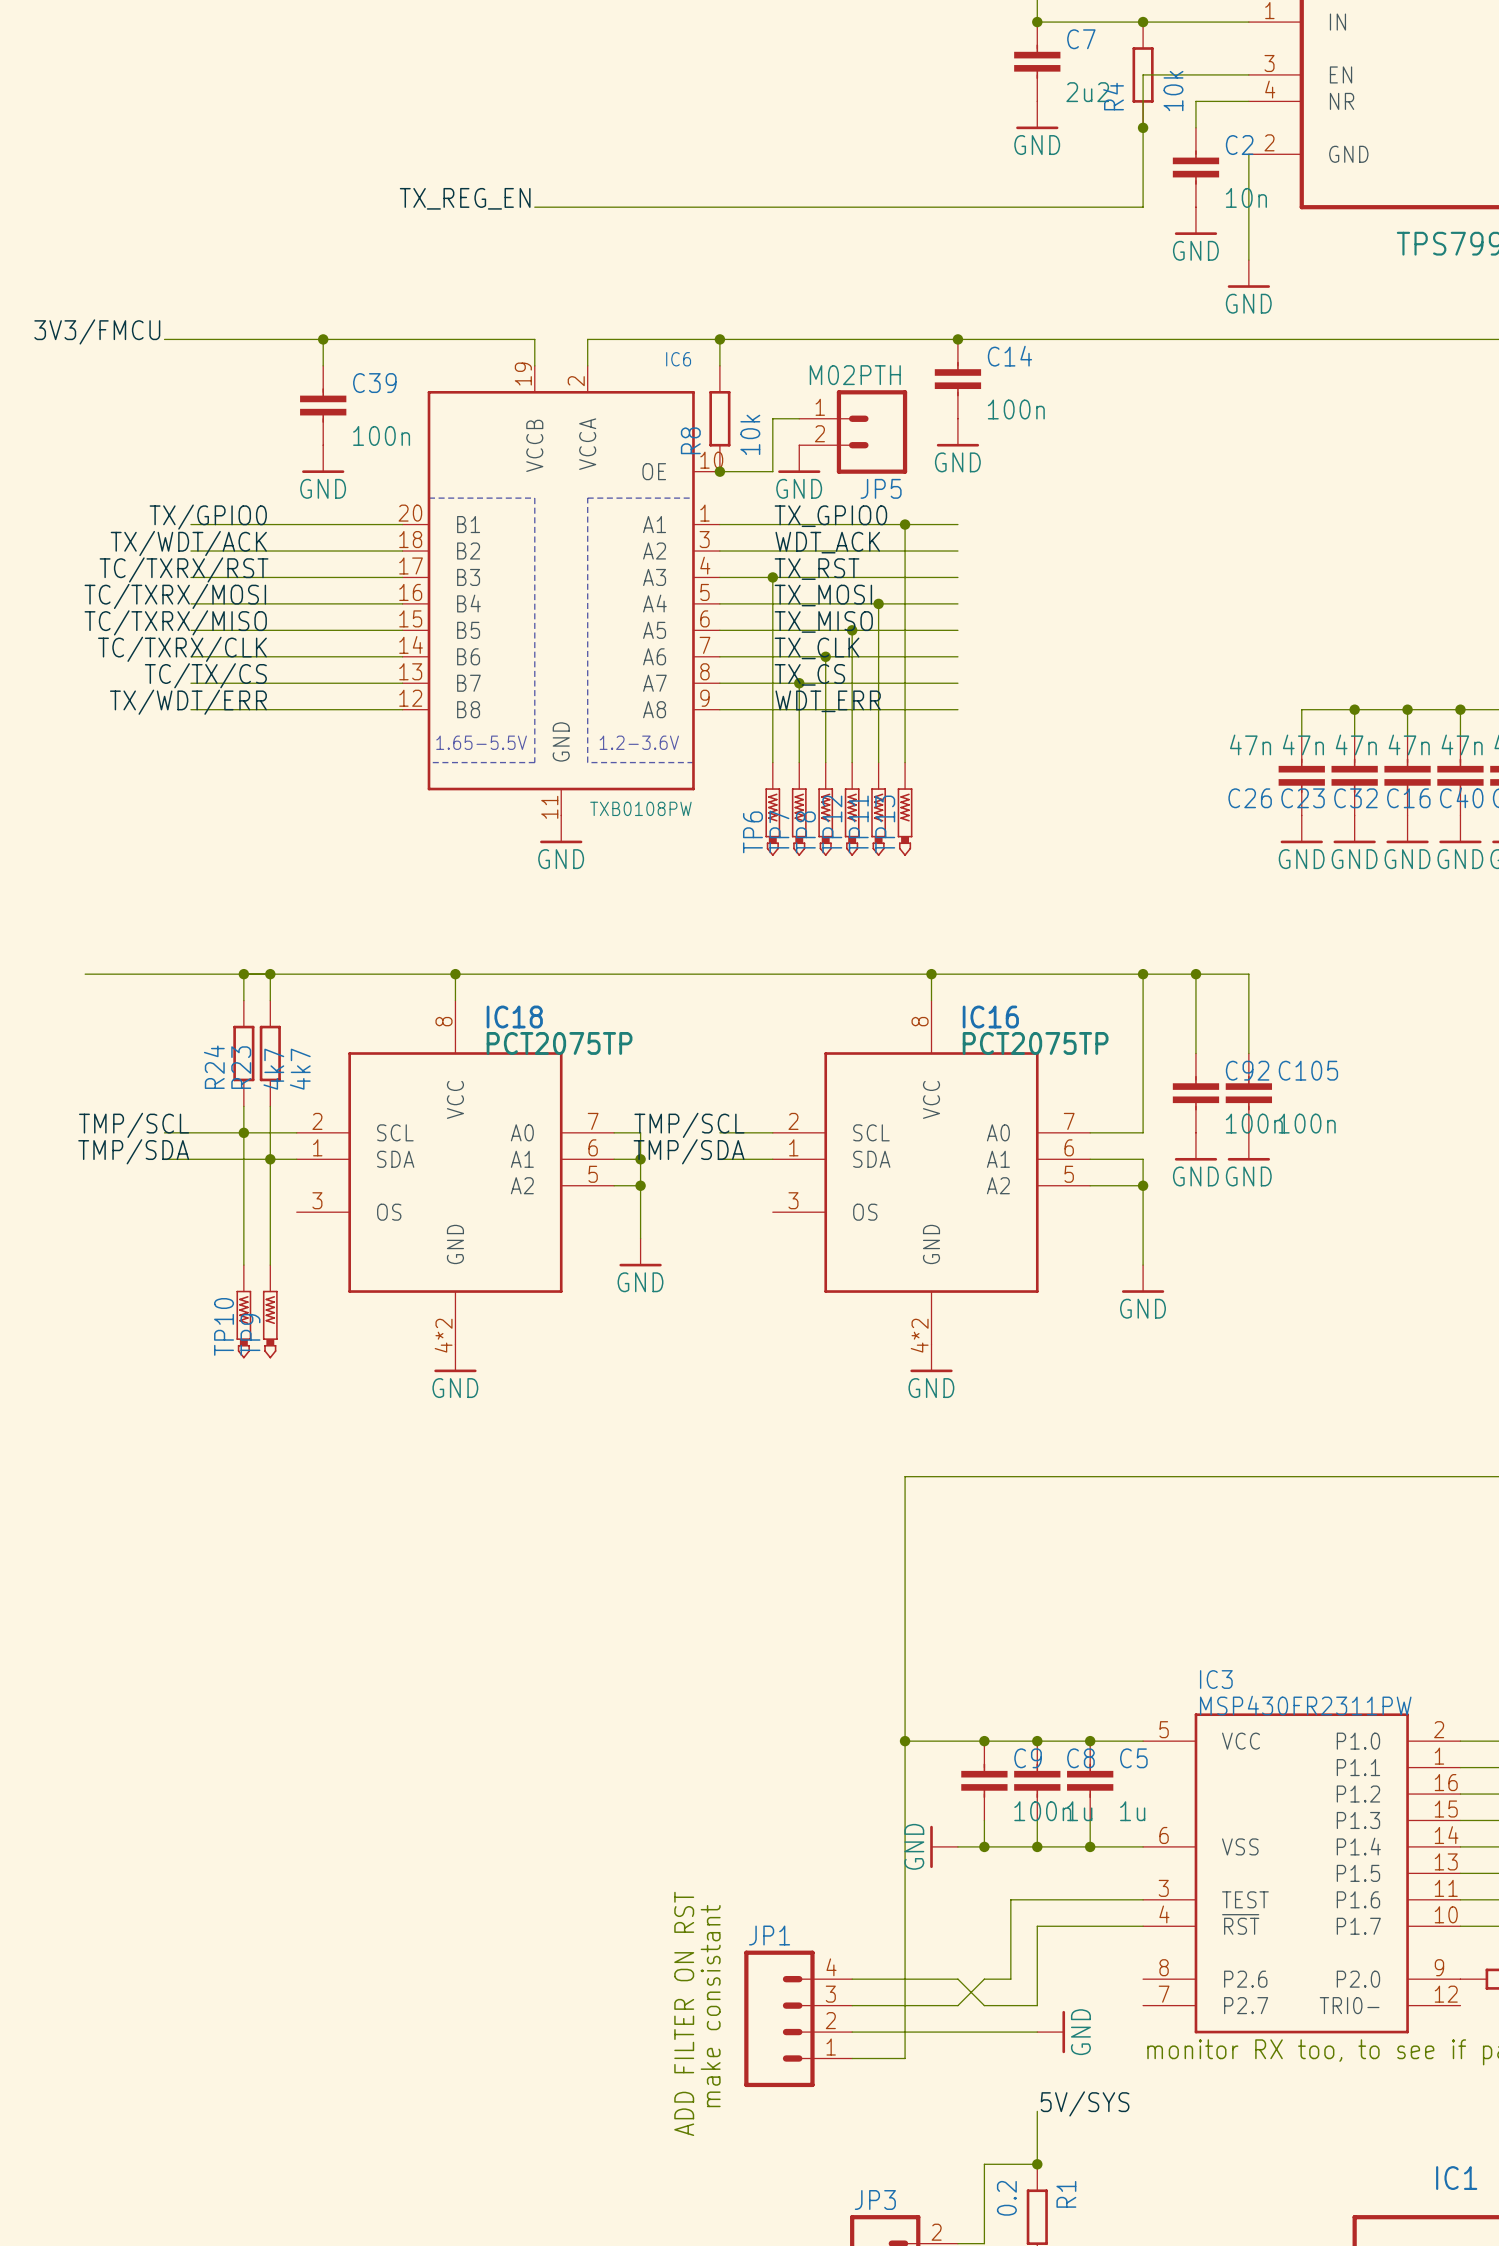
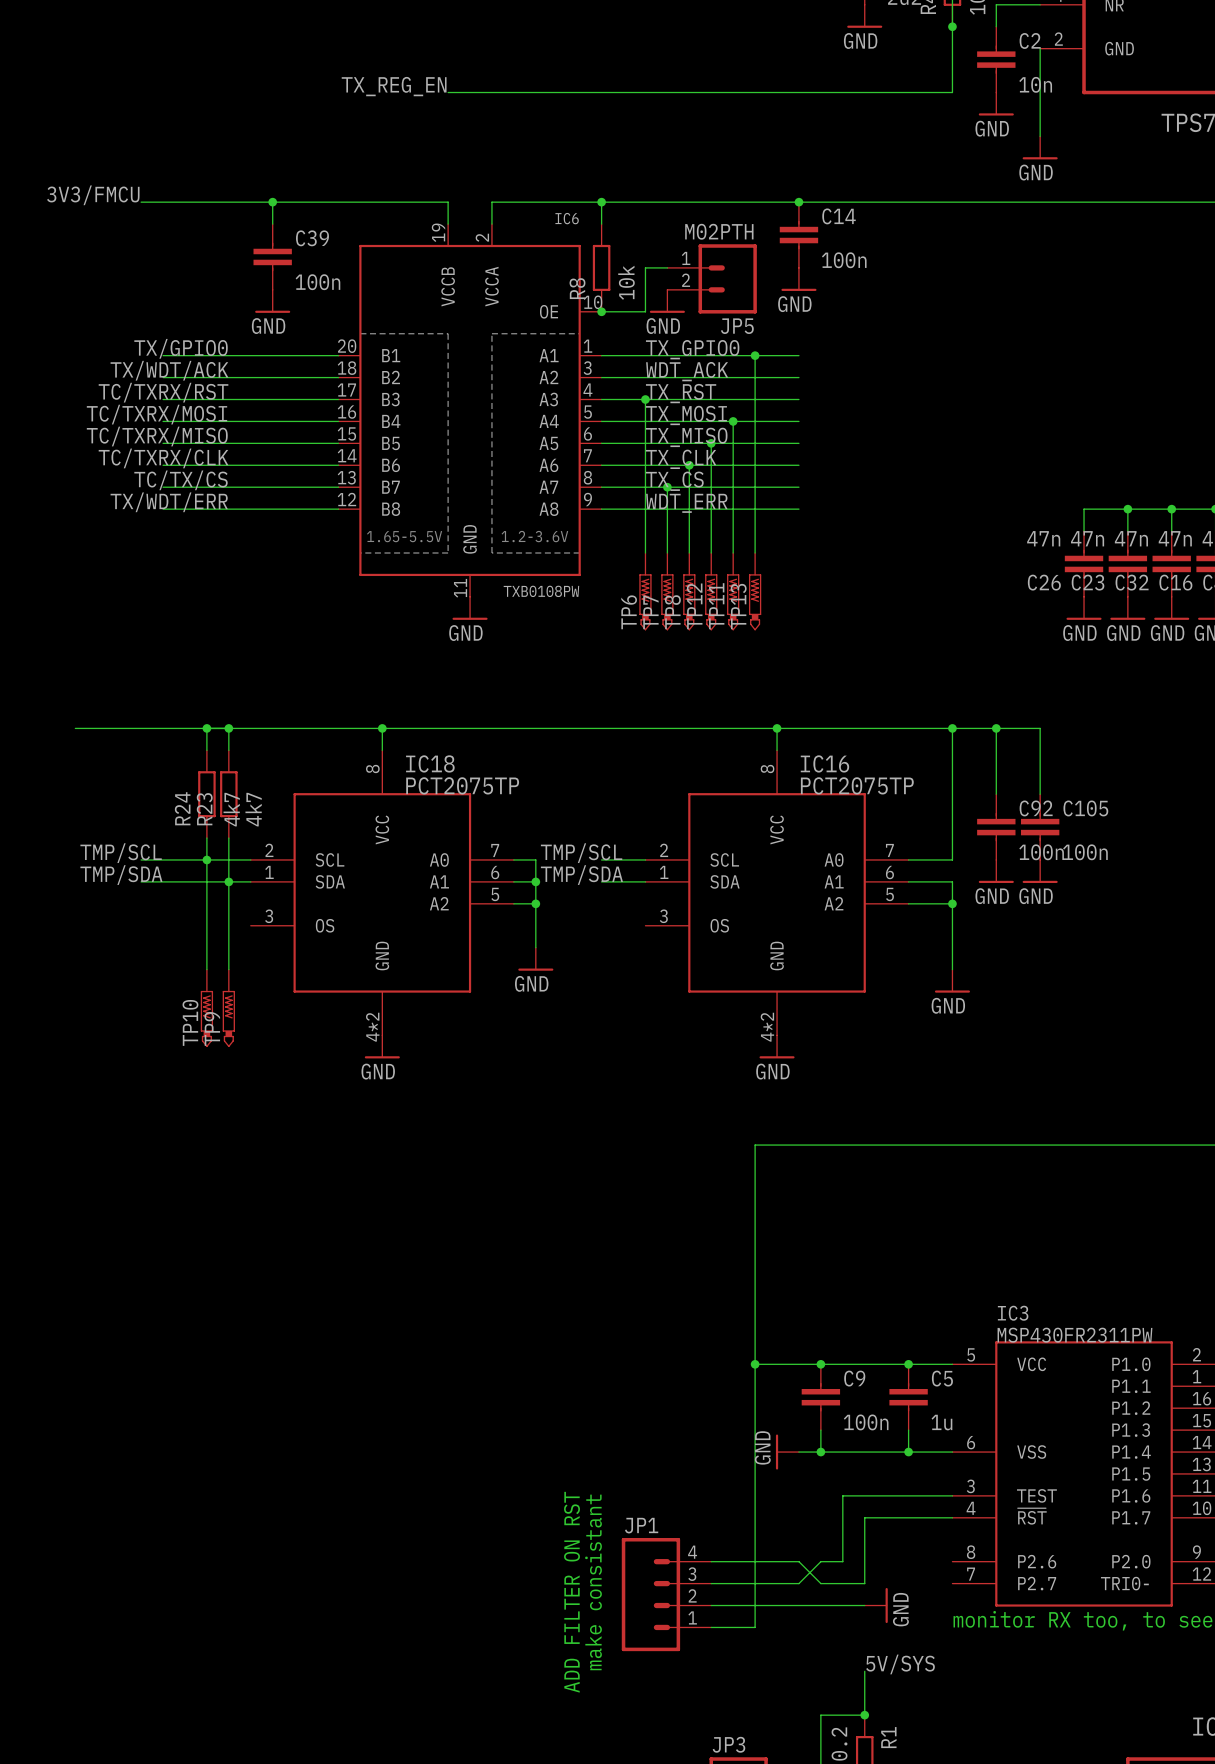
junction: (1037, 1741) -> none
C8: 1u (1037, 1780) -> none
wire: (1037, 1820) (1037, 1846) -> none
junction: (1037, 1846) -> none

